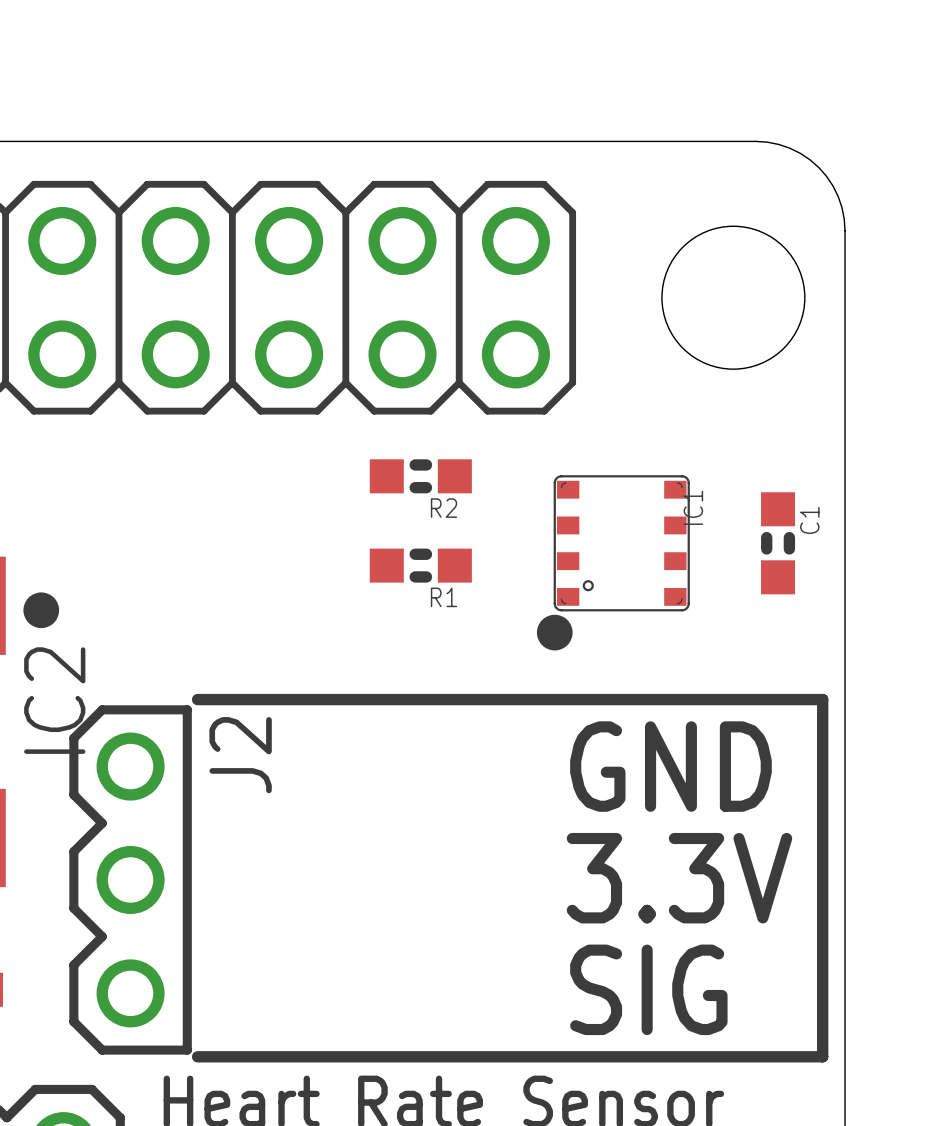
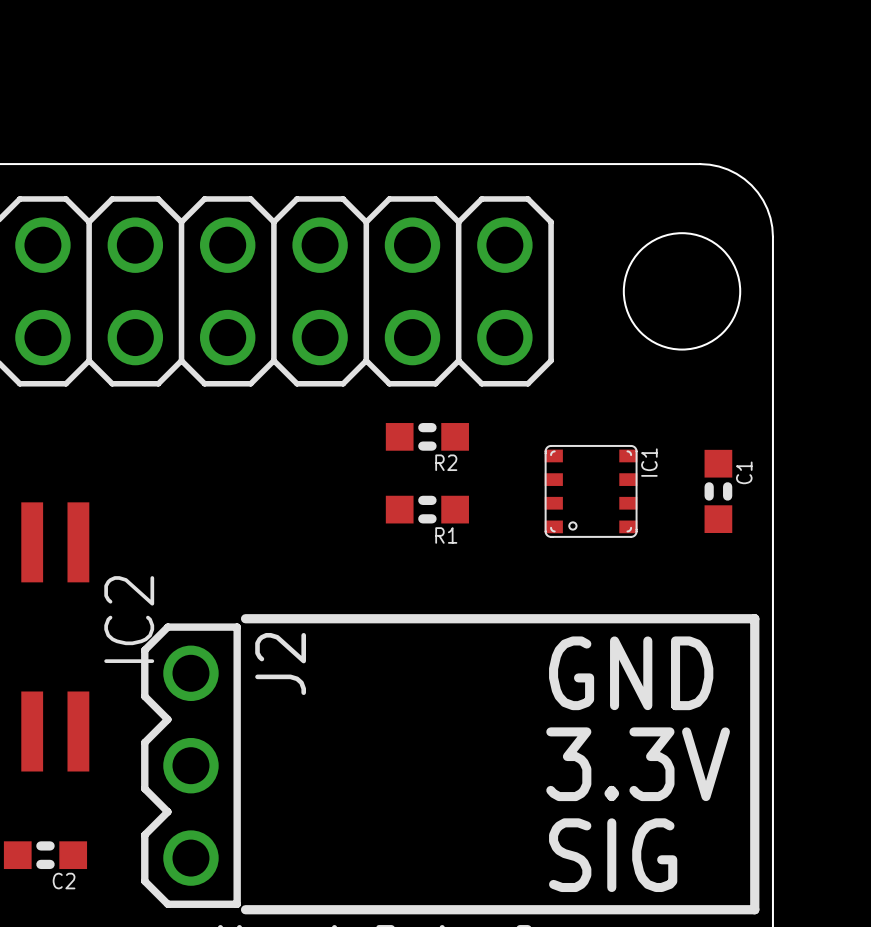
IC1 footprint: [553, 475, 690, 612] -> [544, 445, 638, 538]
drawing: [23, 592, 60, 629] -> none
drawing: [536, 614, 573, 651] -> none

